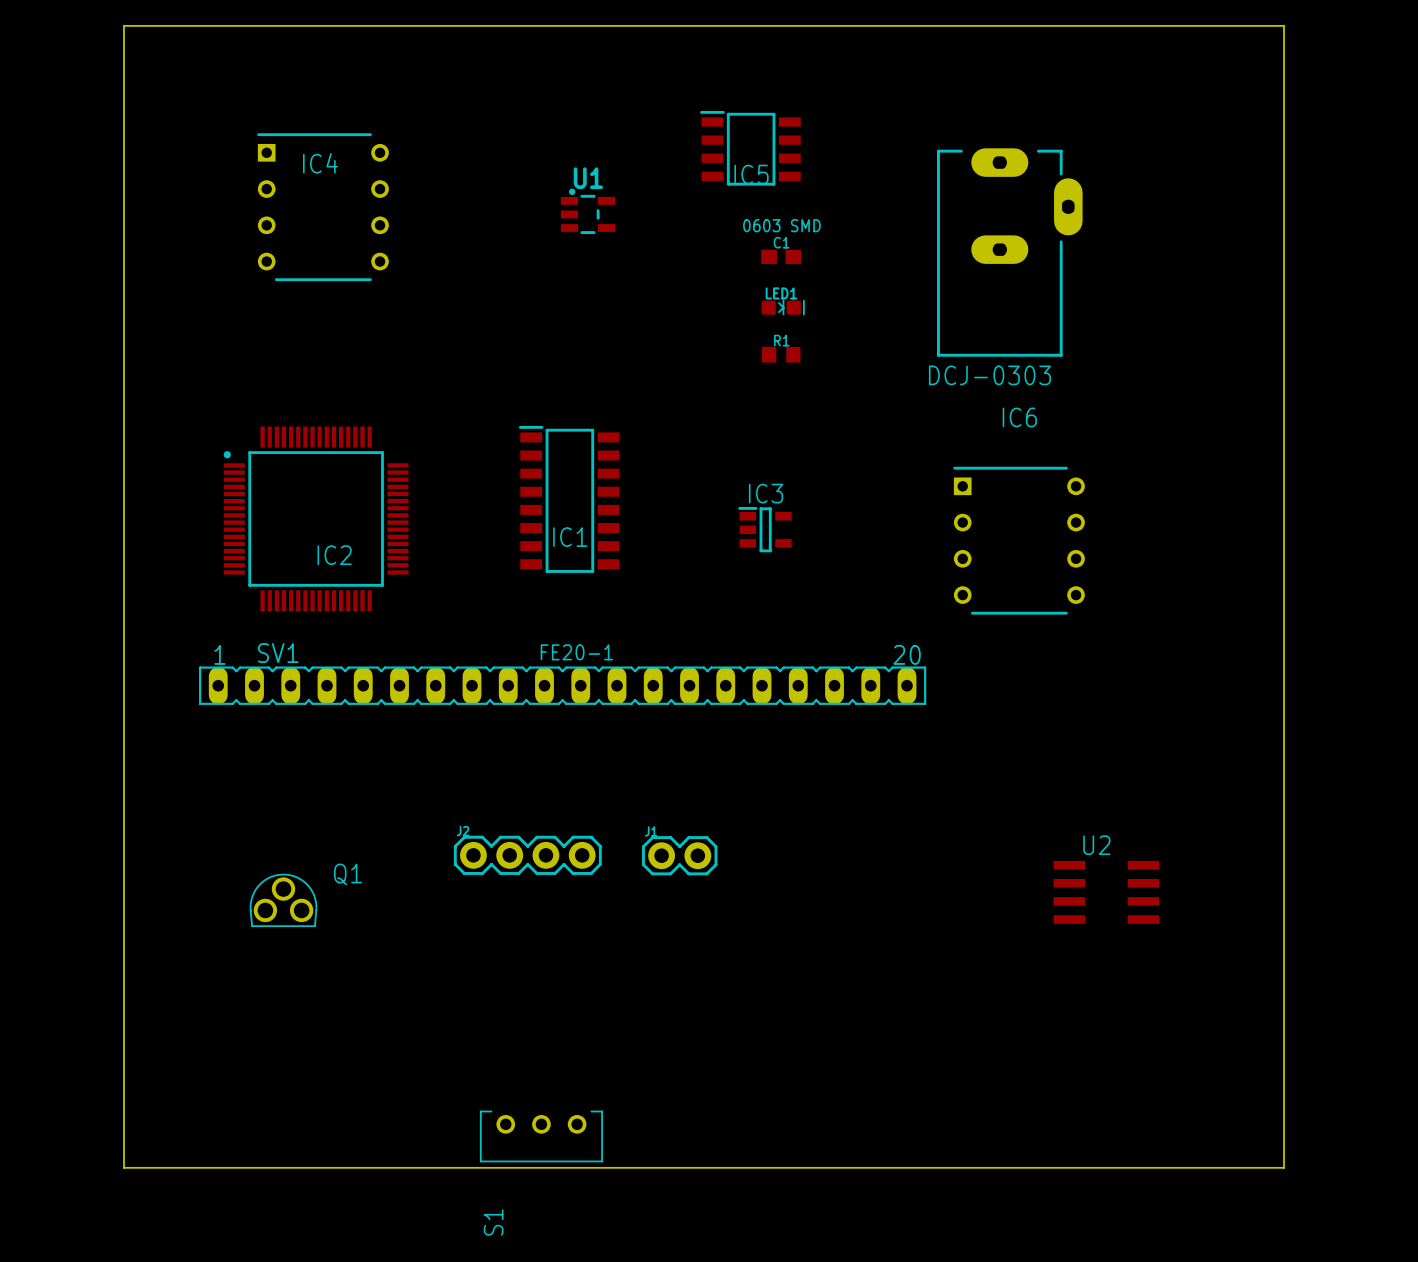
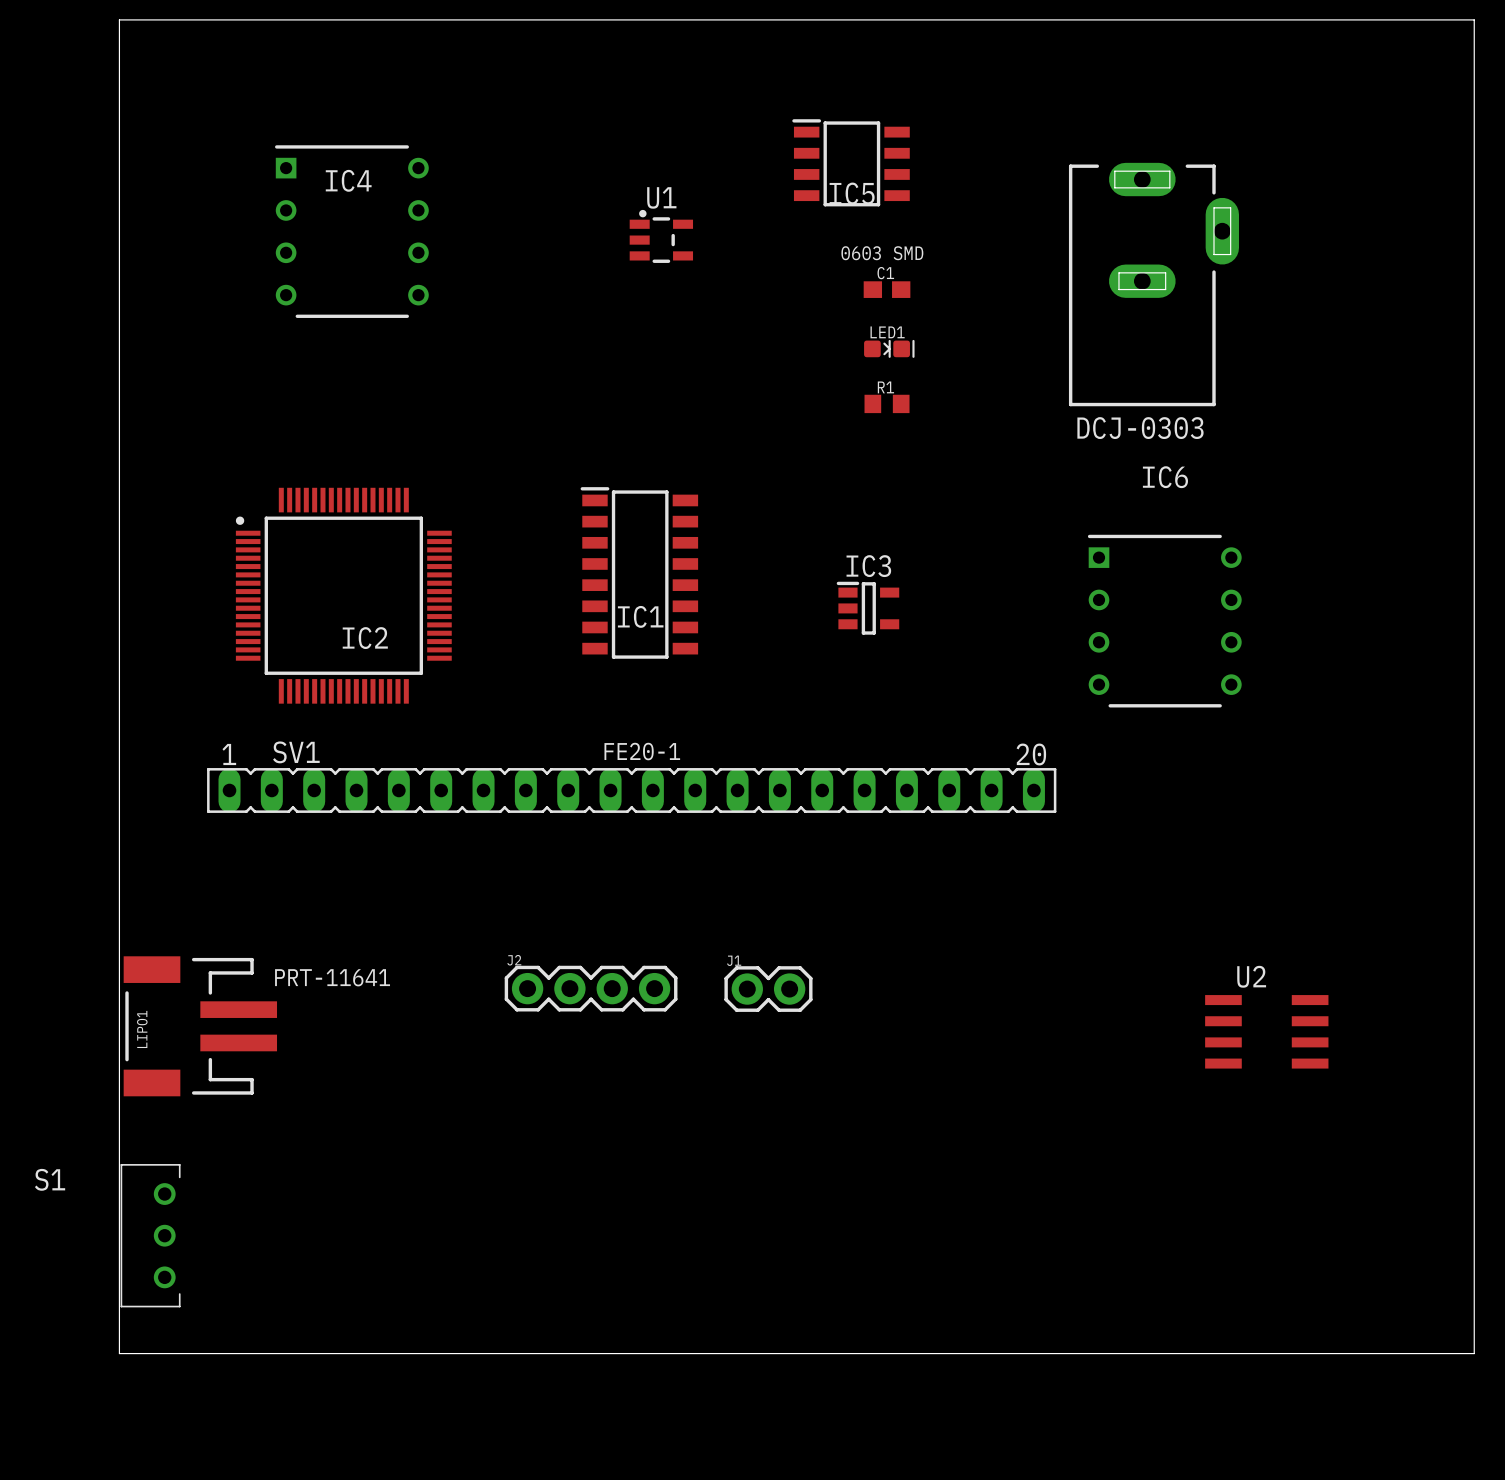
text: none -> PRT-11641 (332, 977)
LIPO1: none -> (200, 1026)
Q1: (283, 900) -> none
S1 rotation: 0° (541, 1136) -> 90° clockwise (150, 1235)
S1 position: (541, 1136) -> (150, 1235)

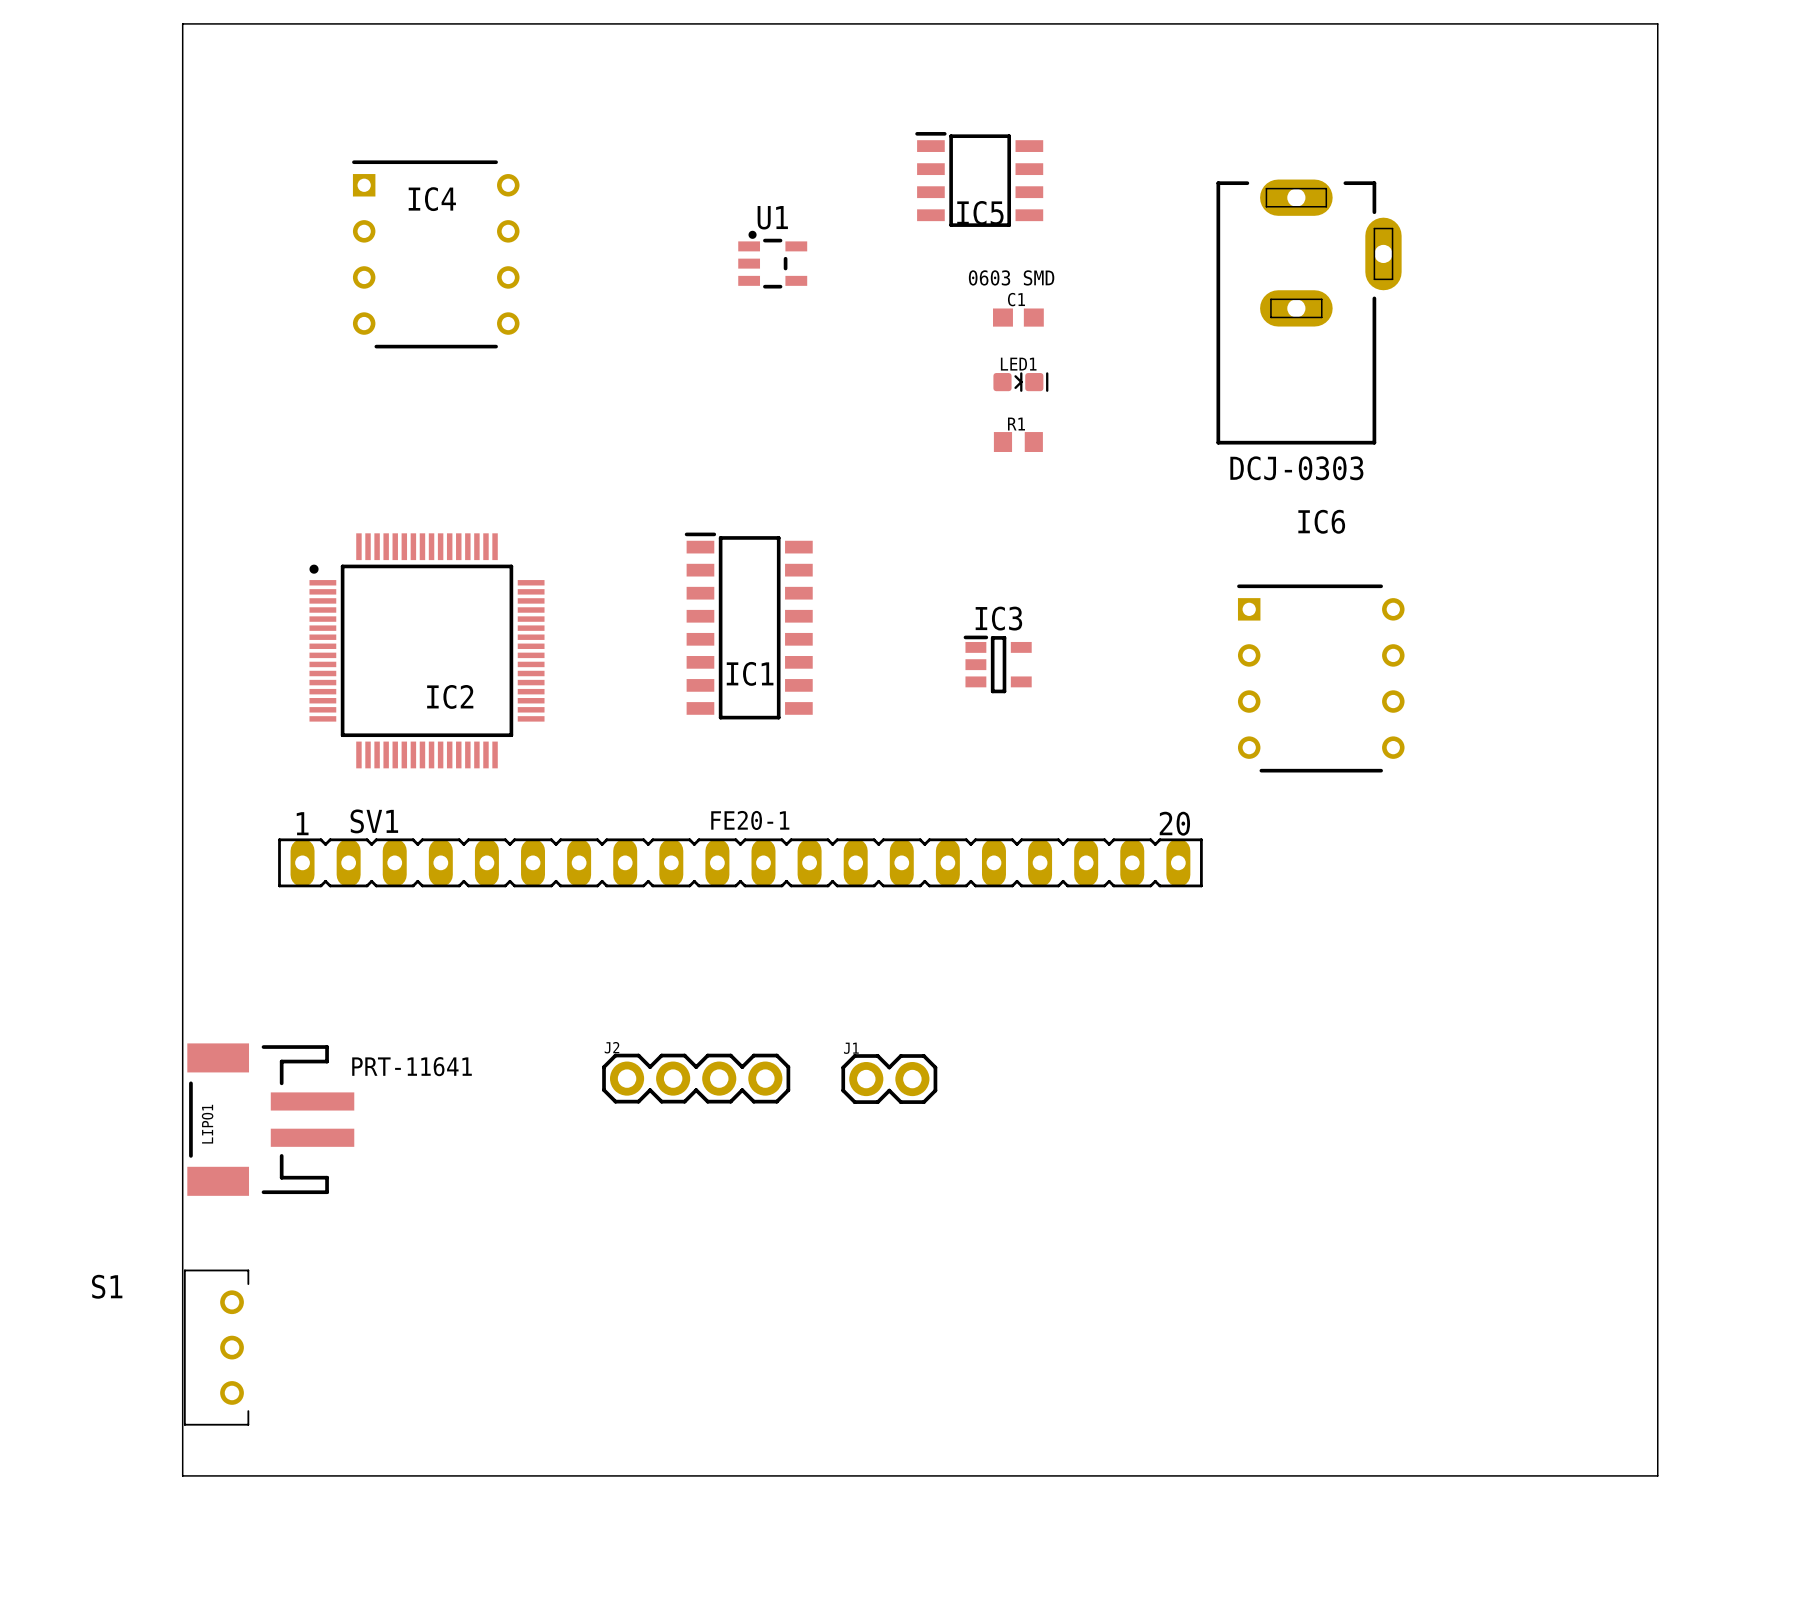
U2: (1266, 1031) -> none

